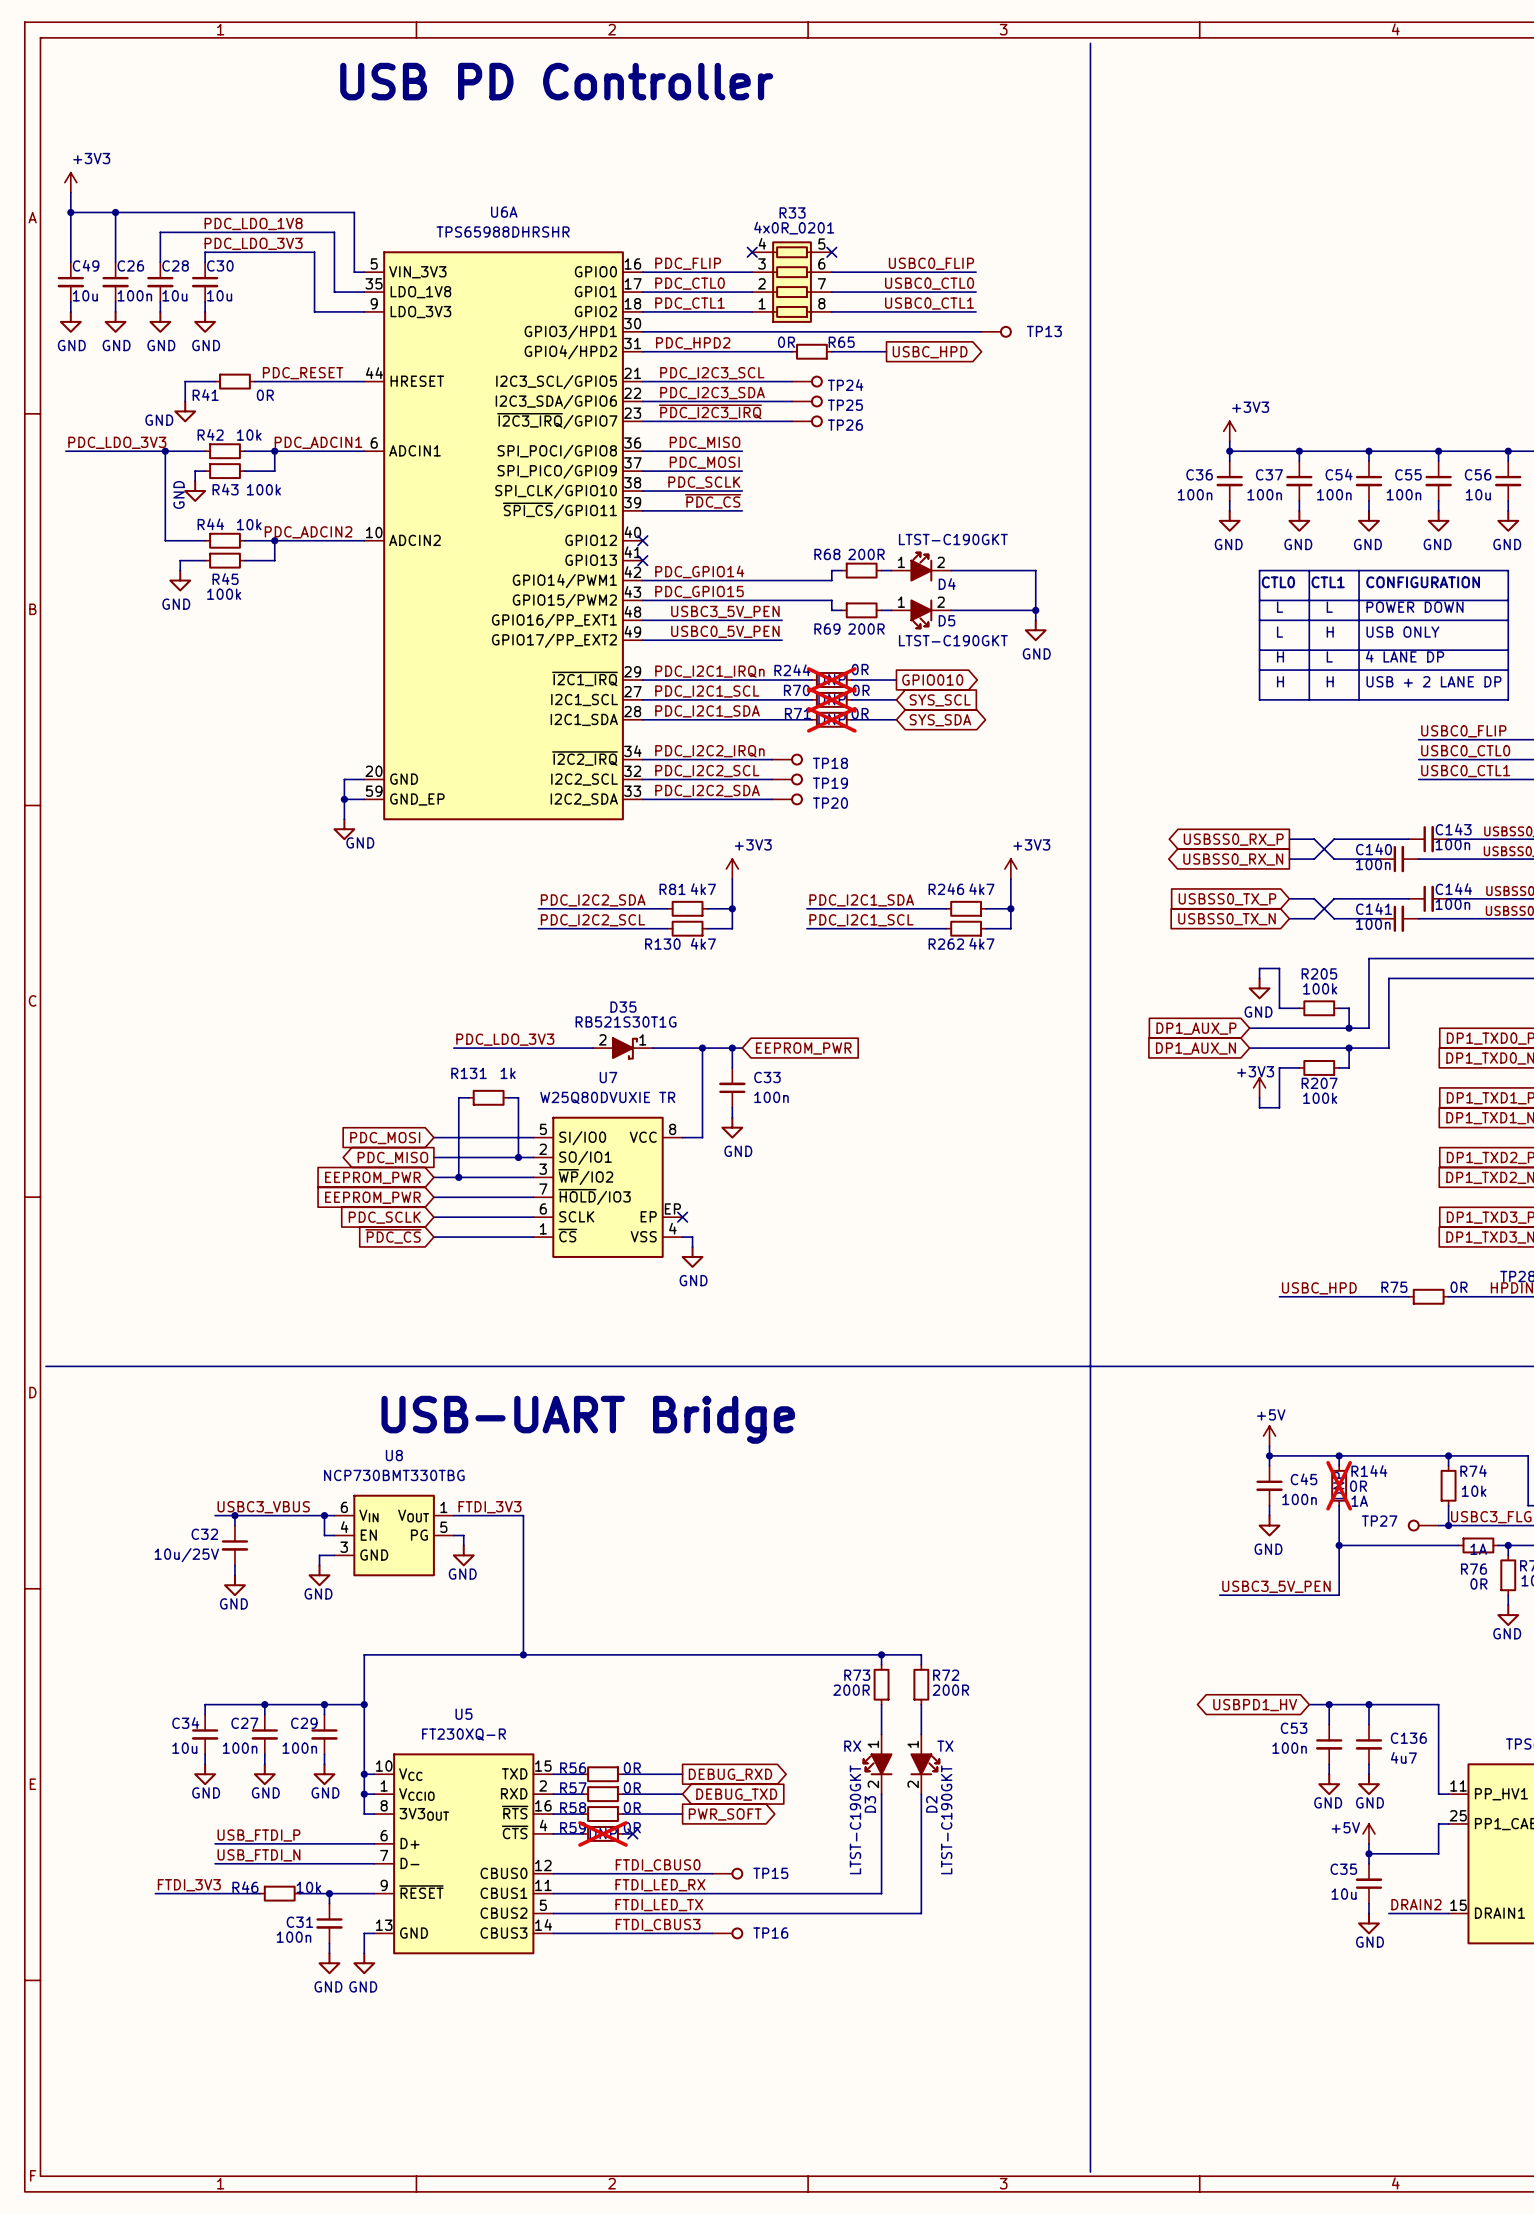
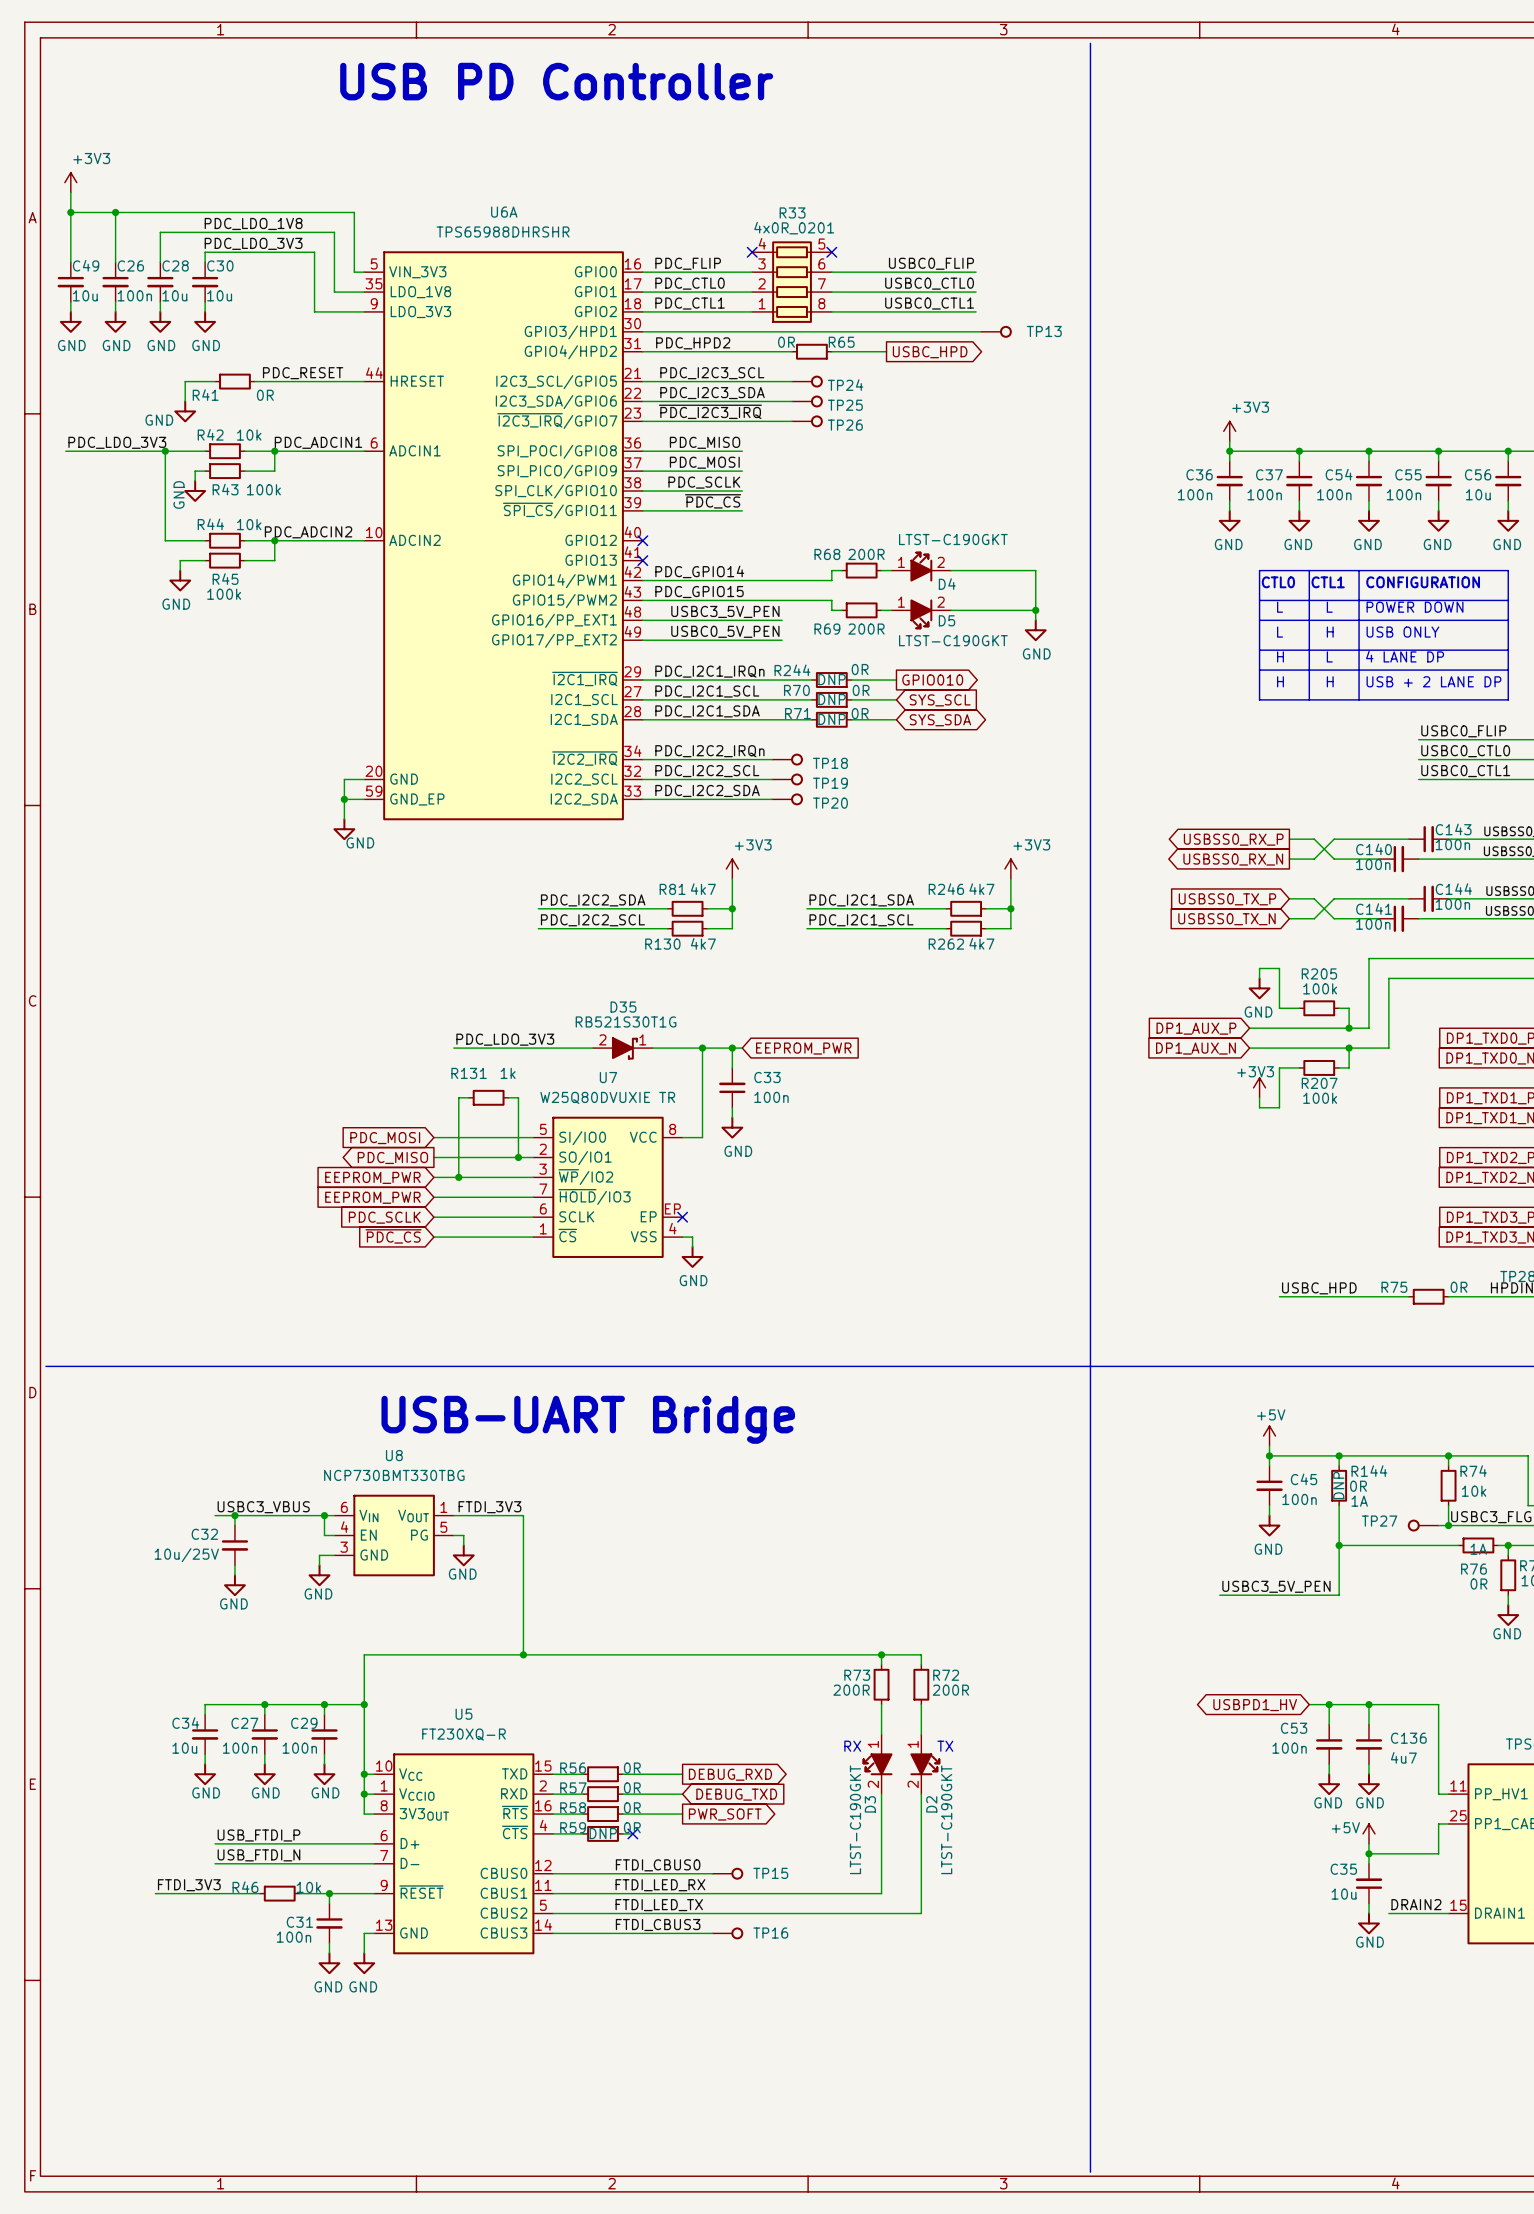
R244 do-not-place cross: (831, 680) -> none
R70 do-not-place cross: (831, 699) -> none
R71 do-not-place cross: (831, 719) -> none
R144 do-not-place cross: (1339, 1485) -> none
R59 do-not-place cross: (603, 1833) -> none

